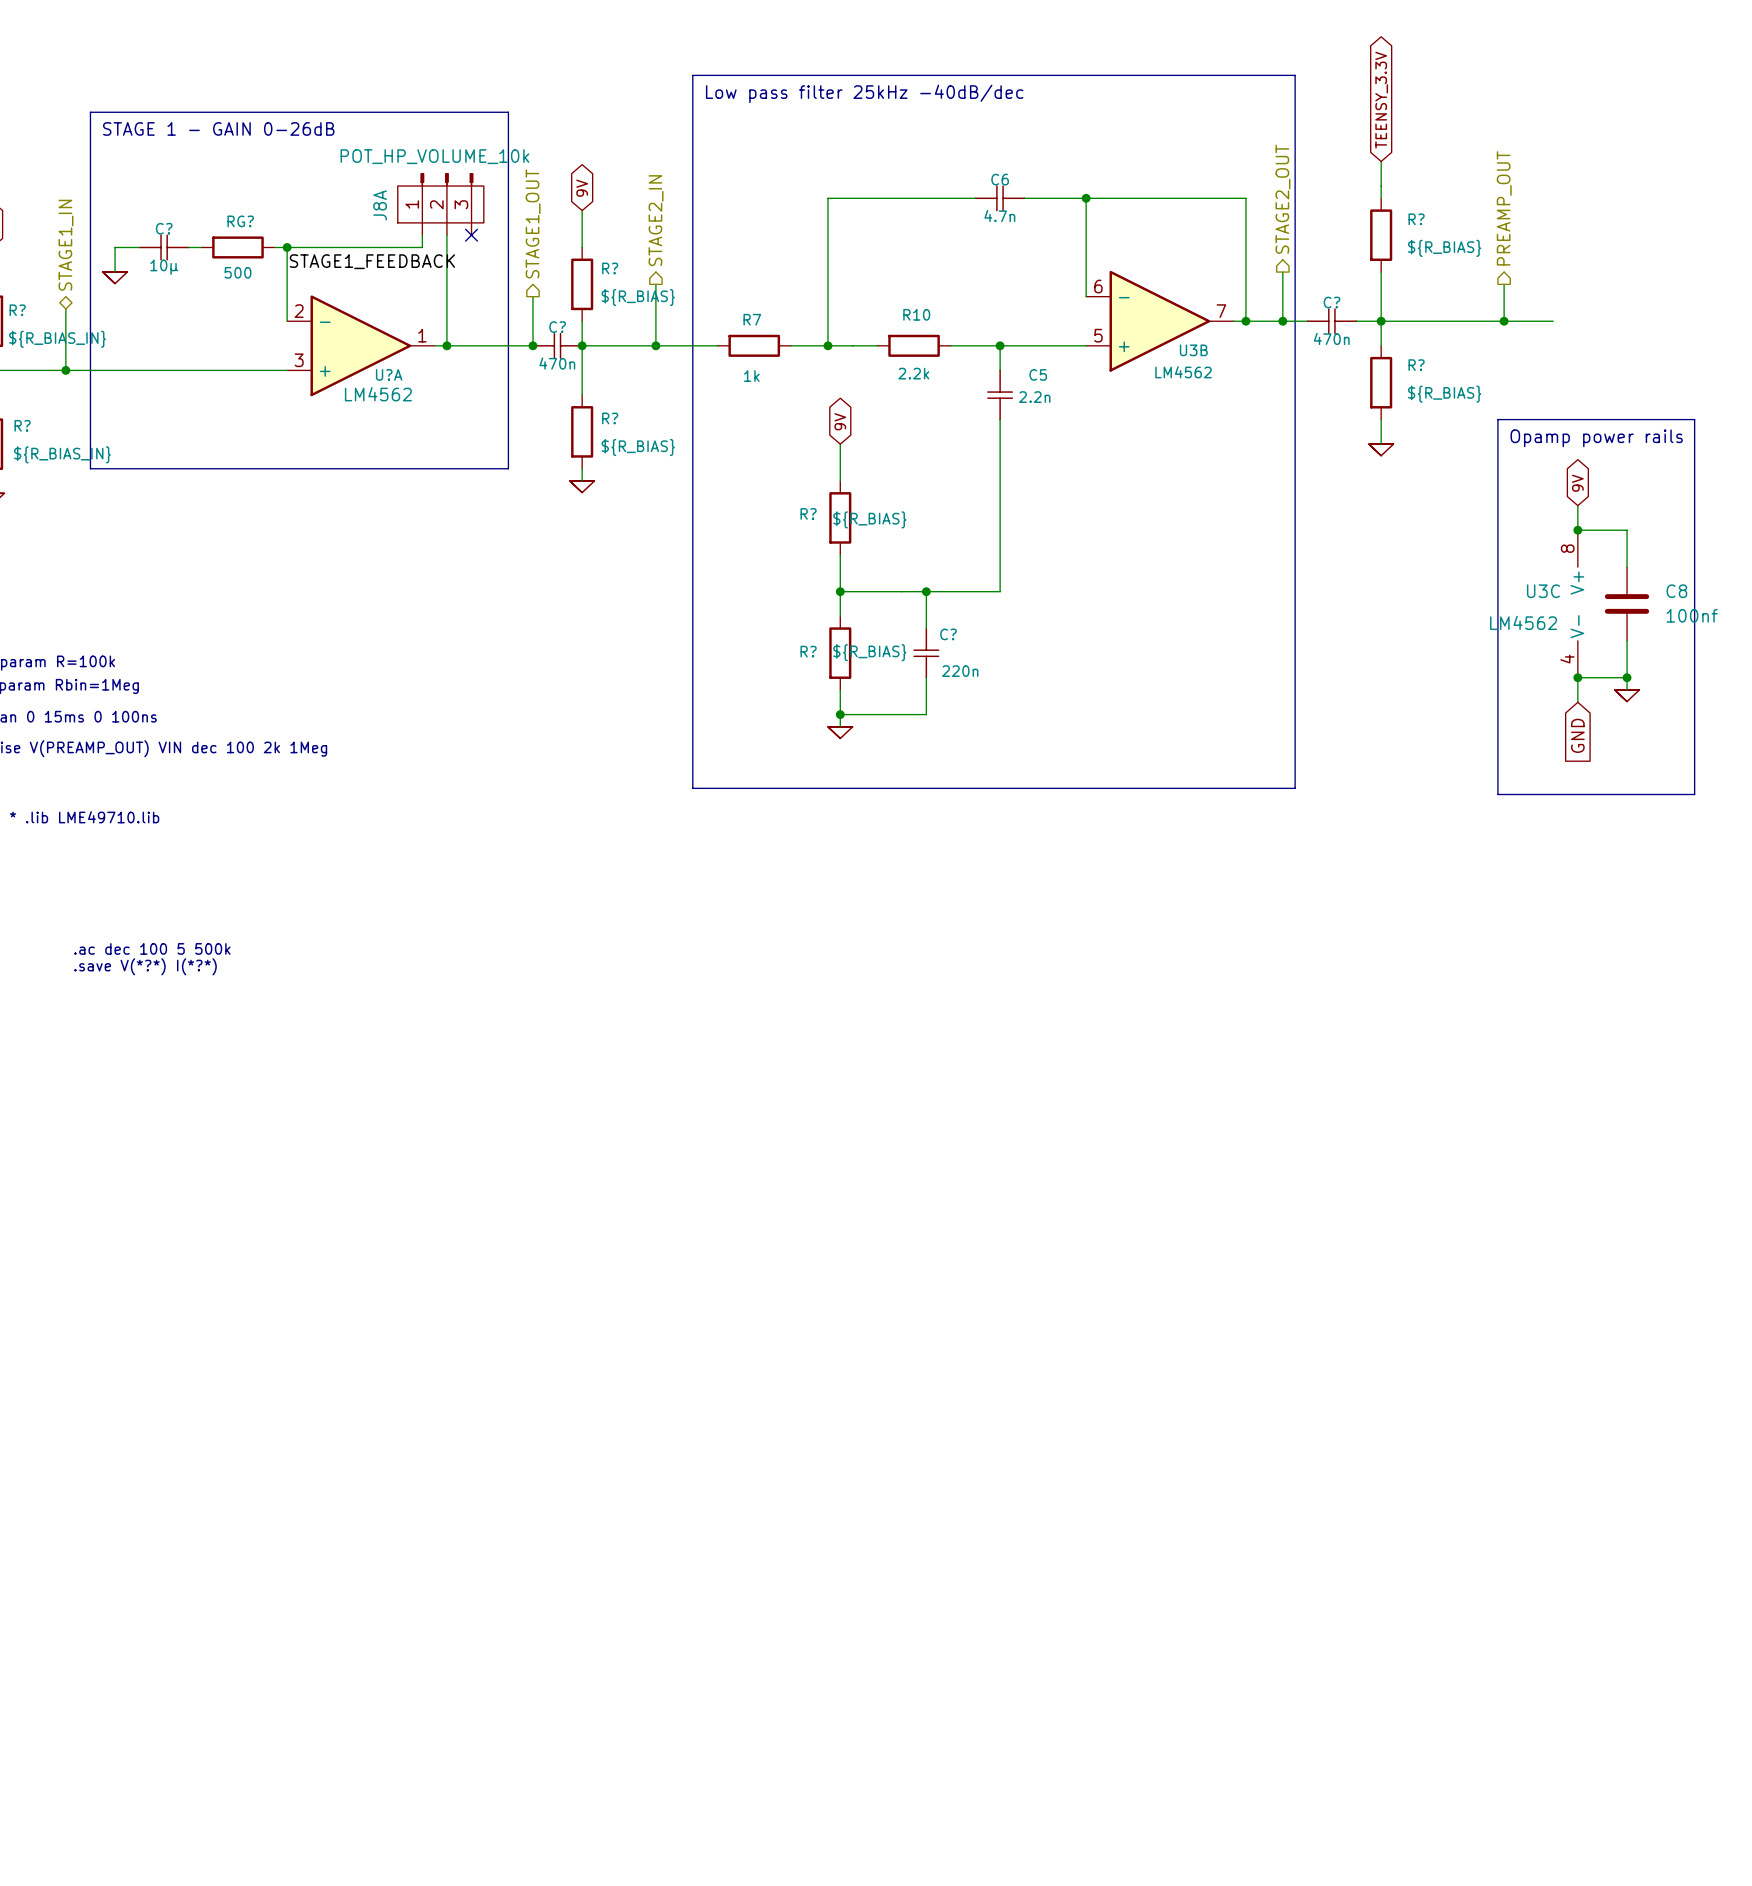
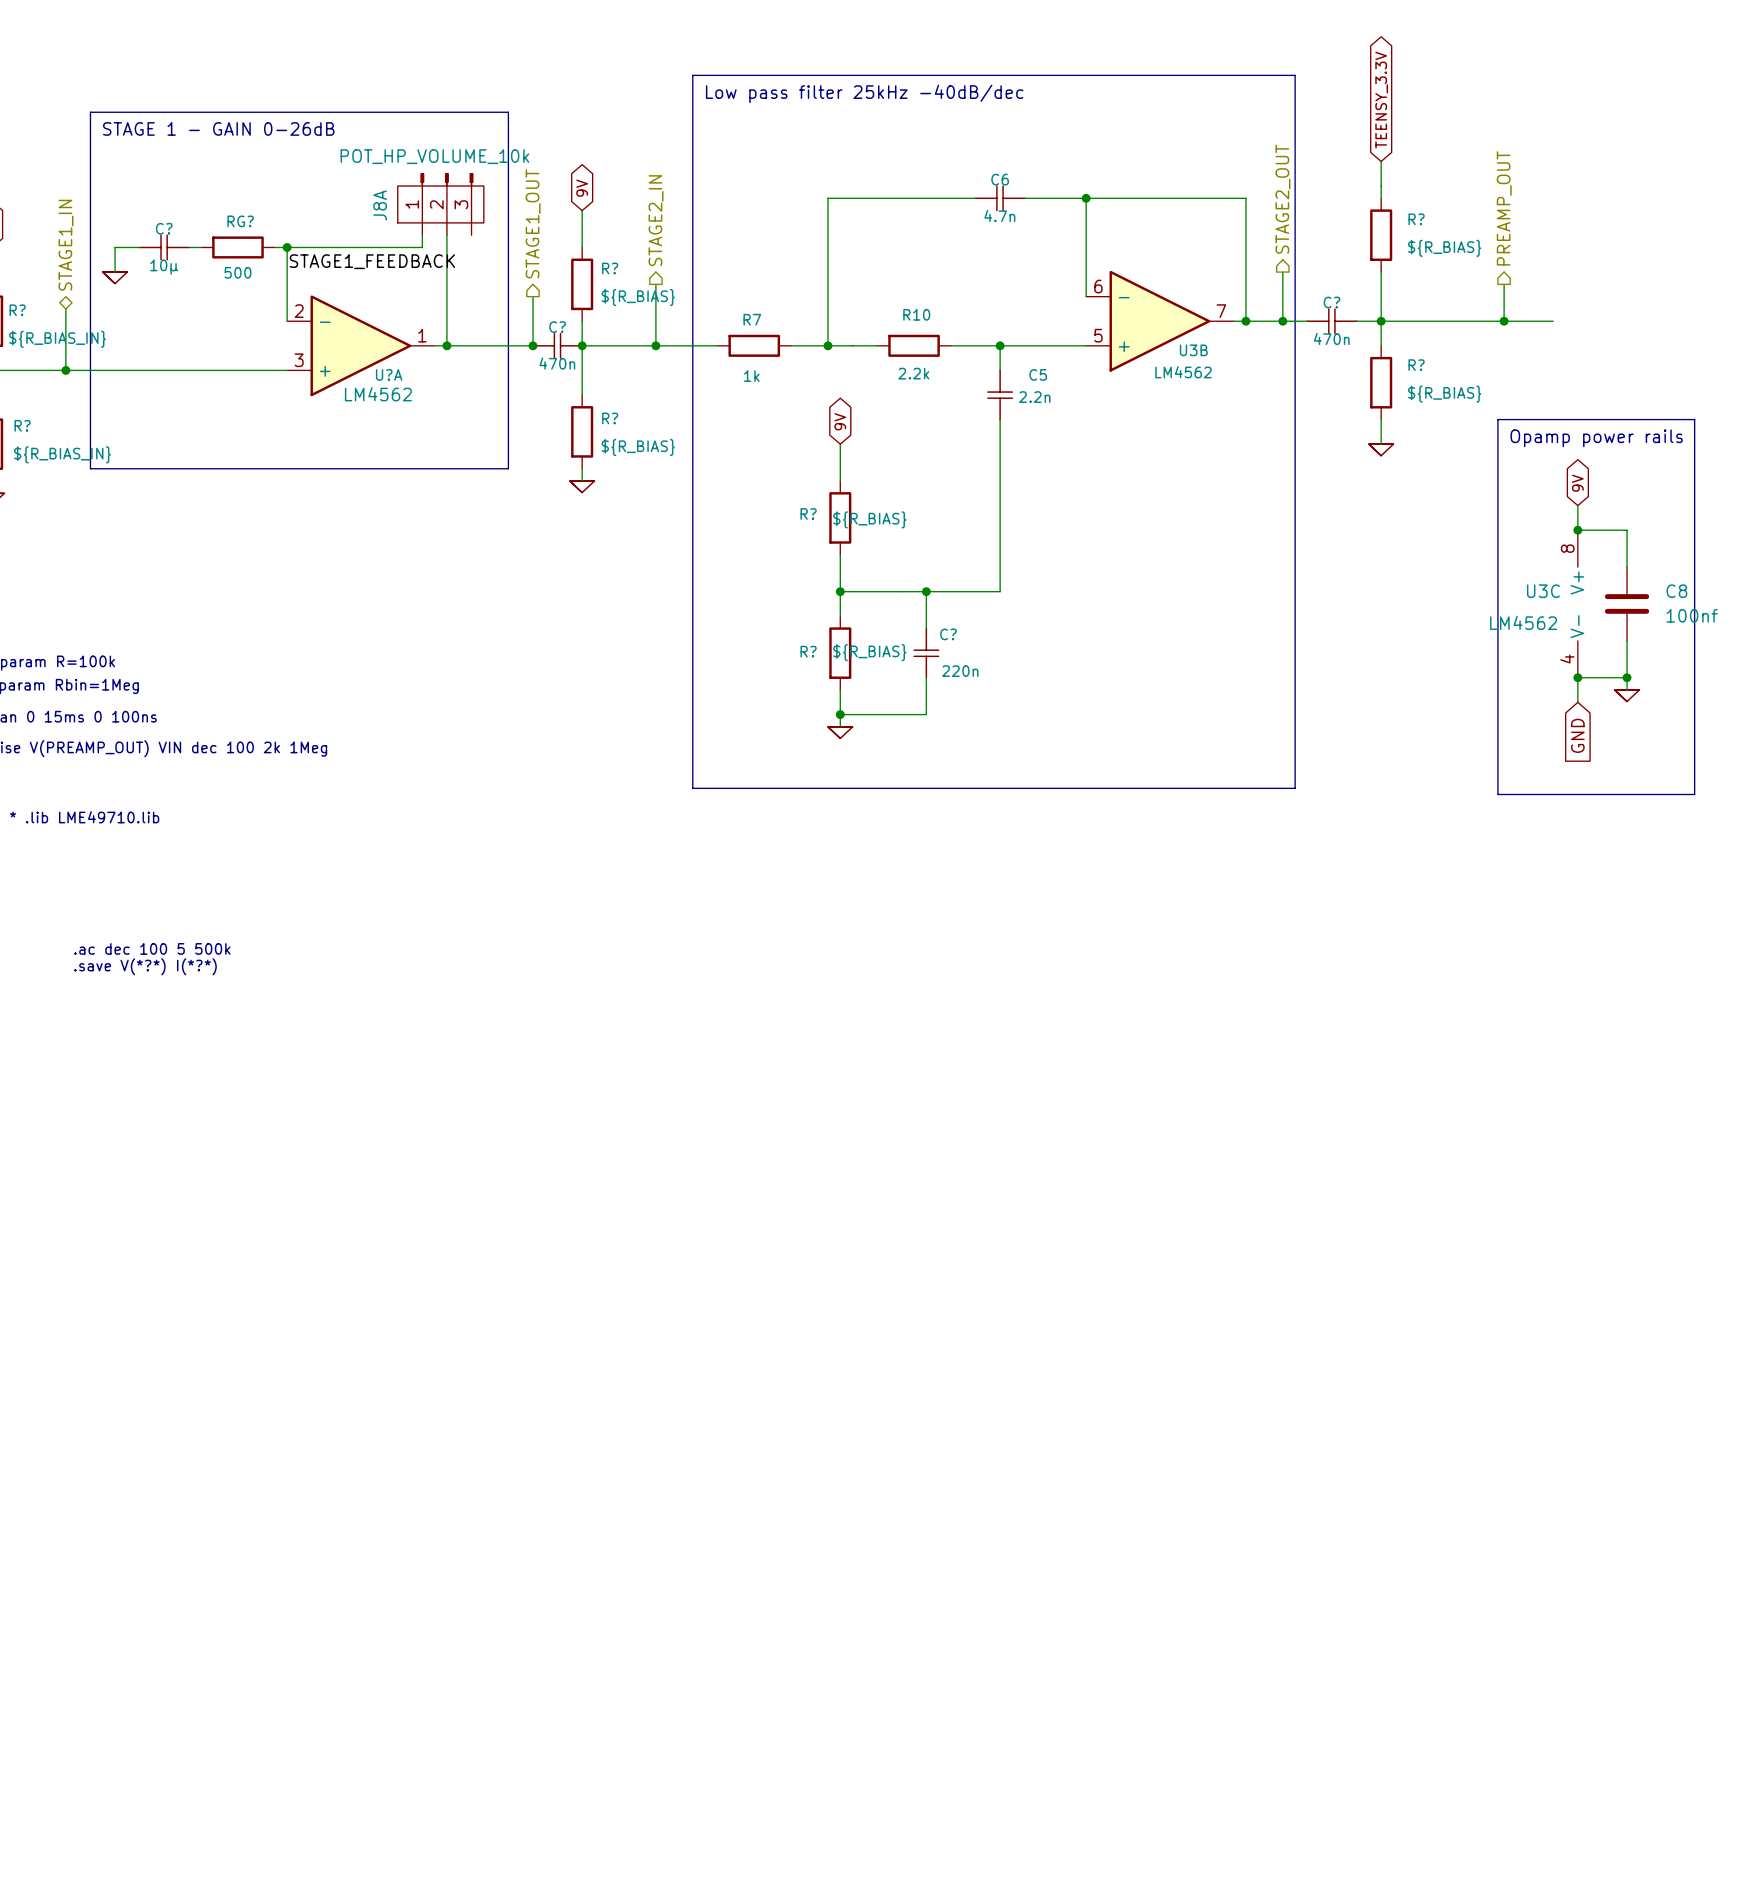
no-connect mark: (471, 235) -> none

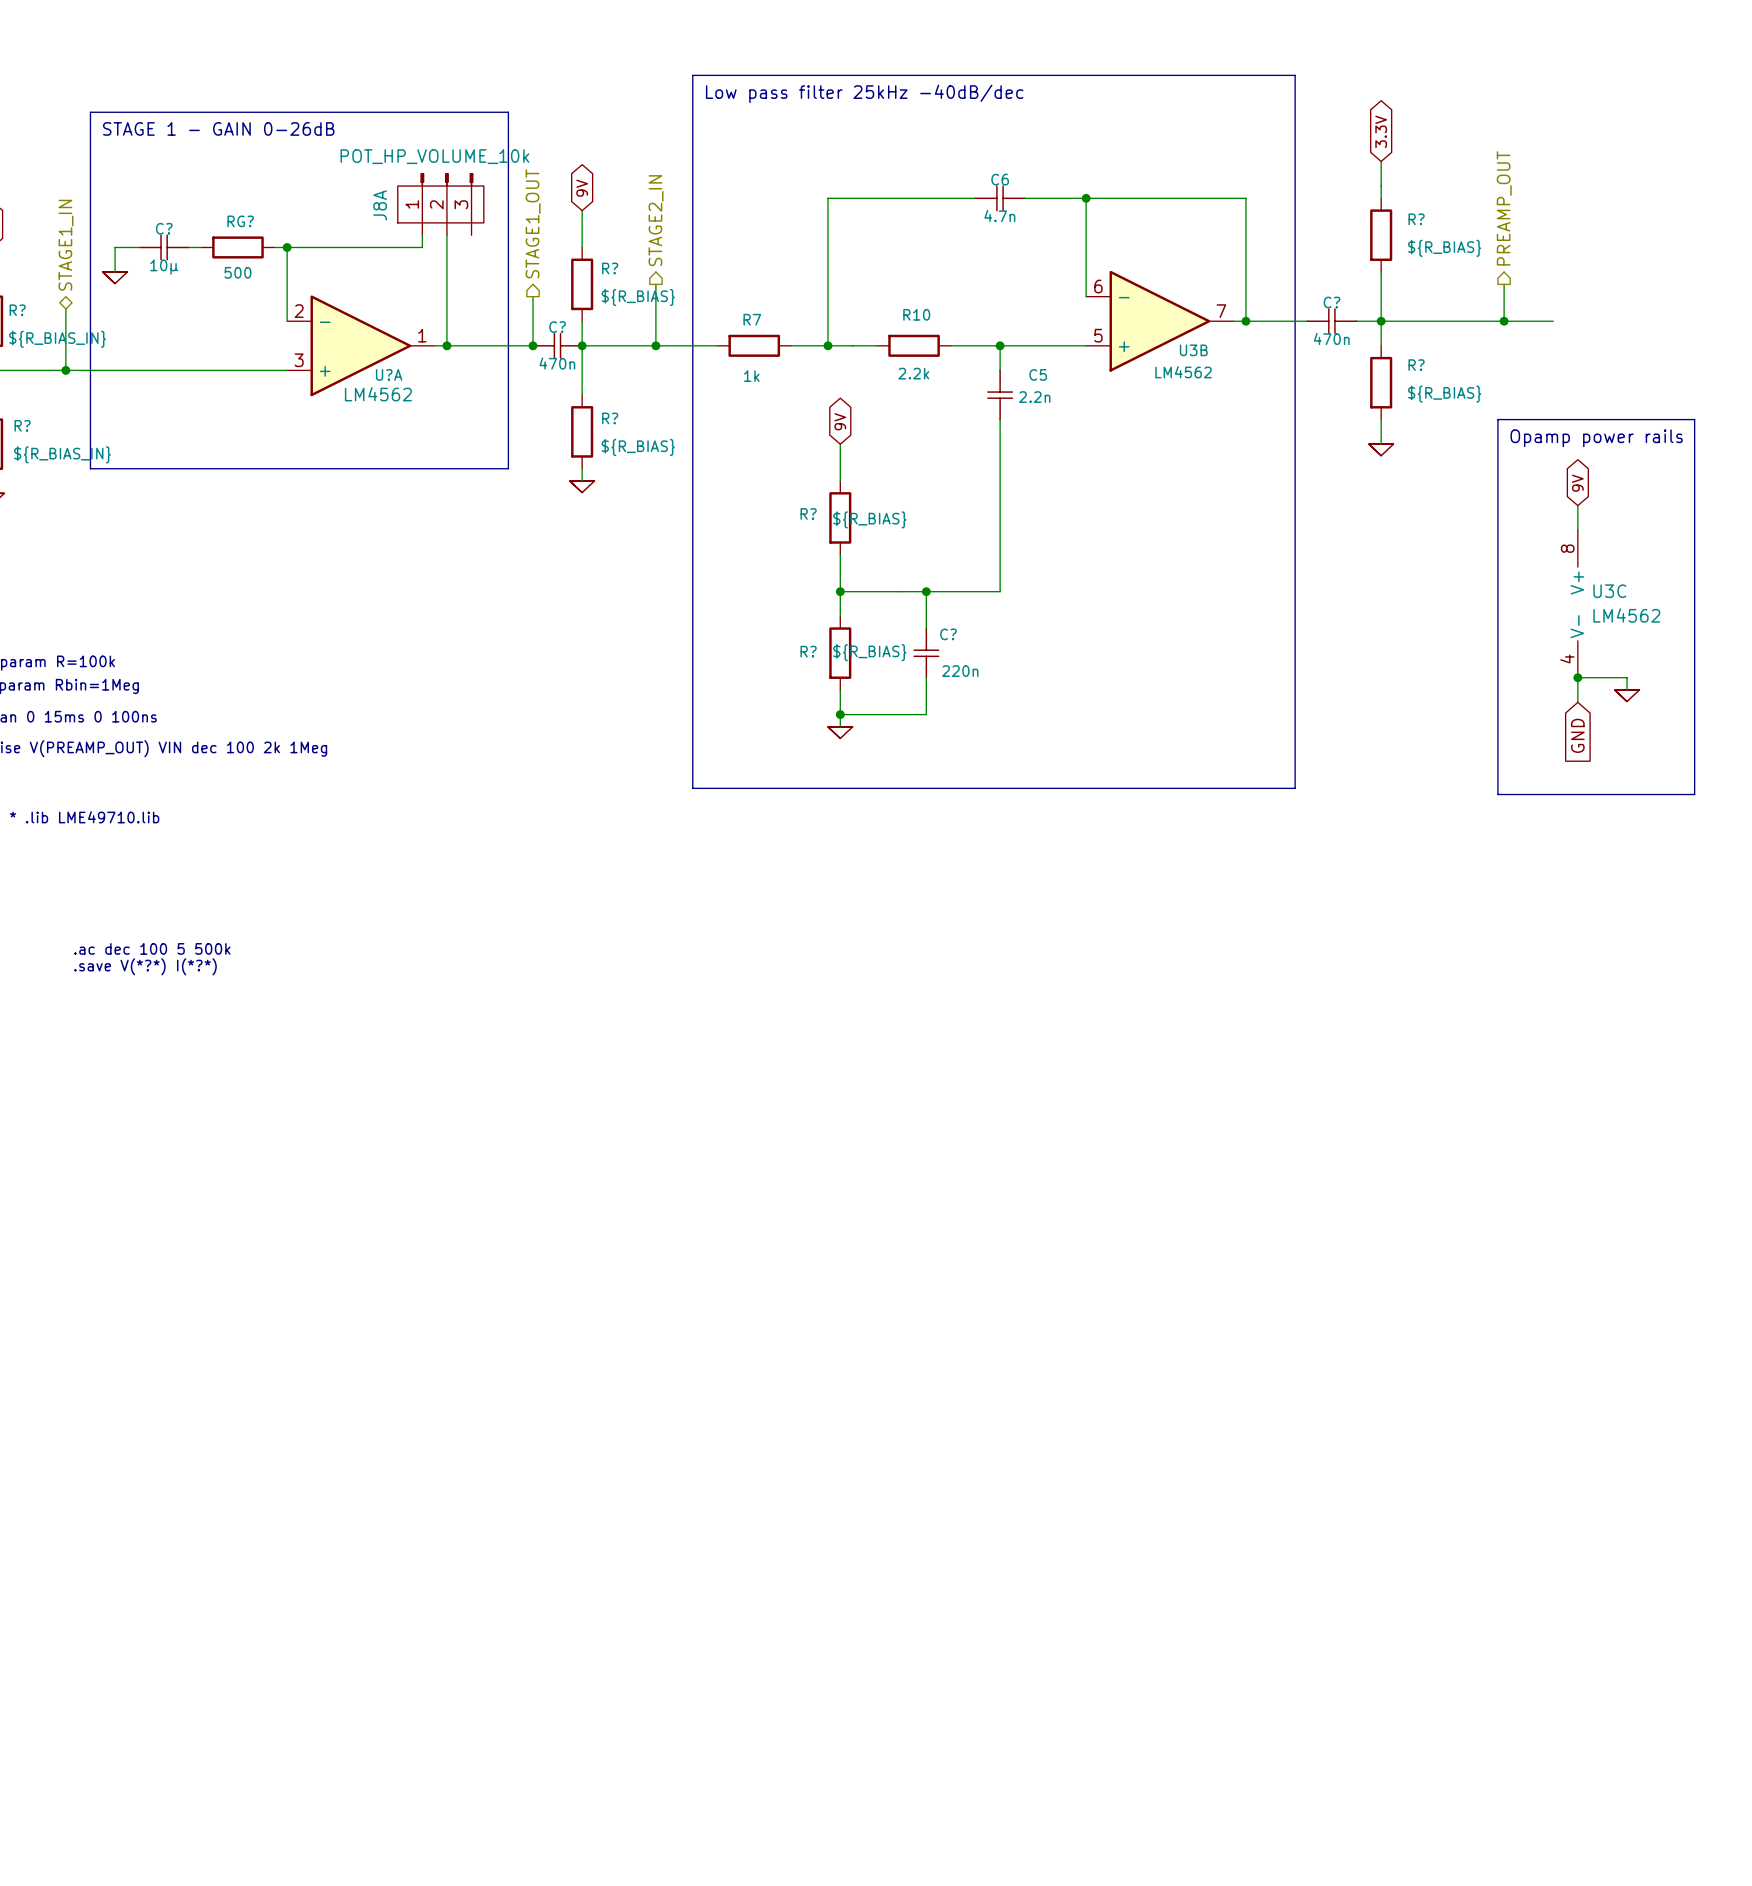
global label: TEENSY_3.3V (1381, 100) -> 3.3V (1381, 131)
hierarchical label: STAGE2_OUT (1282, 199) -> none
label: STAGE1_FEEDBACK (372, 261) -> none
wire: (1282, 272) (1282, 321) -> none
junction: (1282, 321) -> none
wire: (1577, 530) (1627, 530) (1627, 567) -> none
junction: (1577, 530) -> none
U3C name position: U3C (1543, 591) -> U3C (1609, 591)
C8: 100nf (1627, 603) -> none
U3C value position: LM4562 (1523, 622) -> LM4562 (1626, 615)
wire: (1627, 640) (1627, 677) -> none
junction: (1627, 677) -> none

